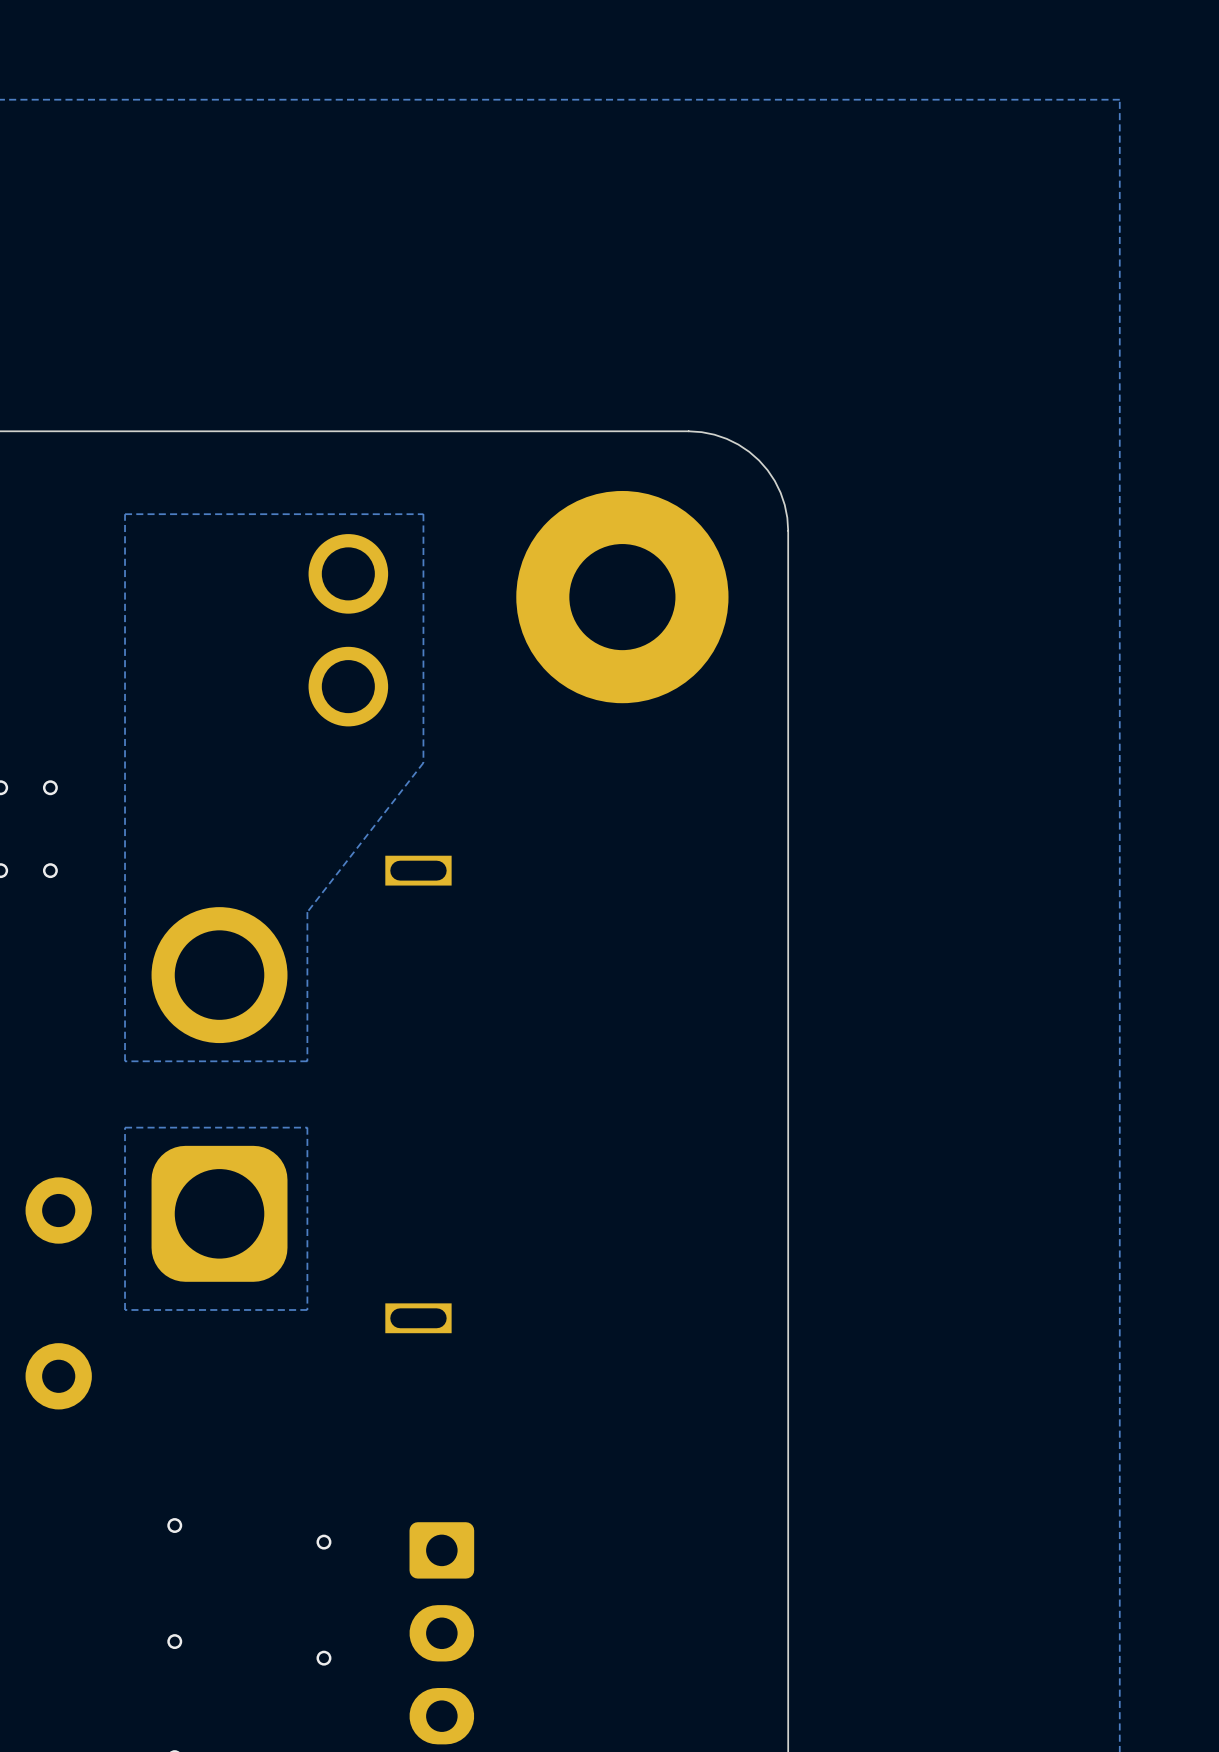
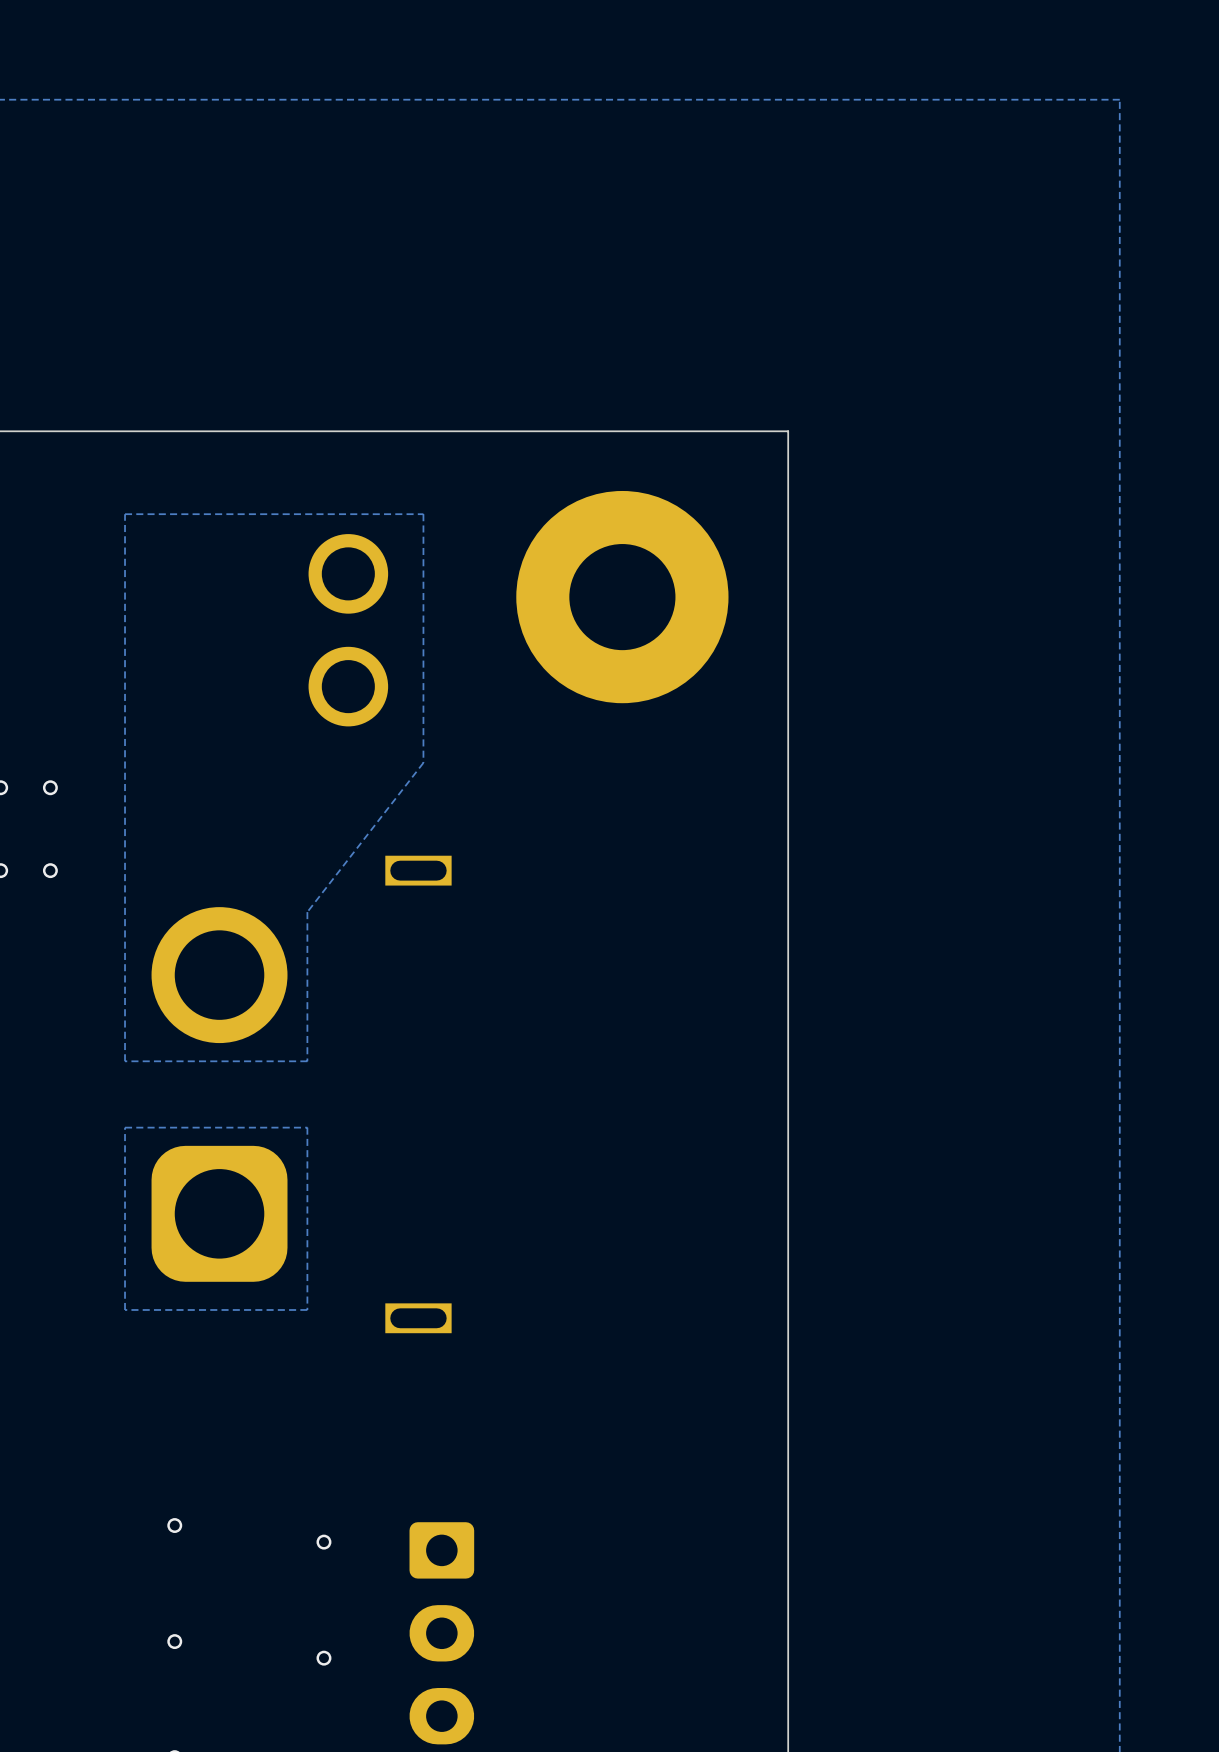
board edge: (688, 431) (714, 434) (726, 438) (749, 451) (759, 460) (774, 481) (780, 492) (784, 505) (788, 530) -> (688, 431) (788, 431) (788, 530)
part: (58, 1210) -> none
part: (58, 1376) -> none

